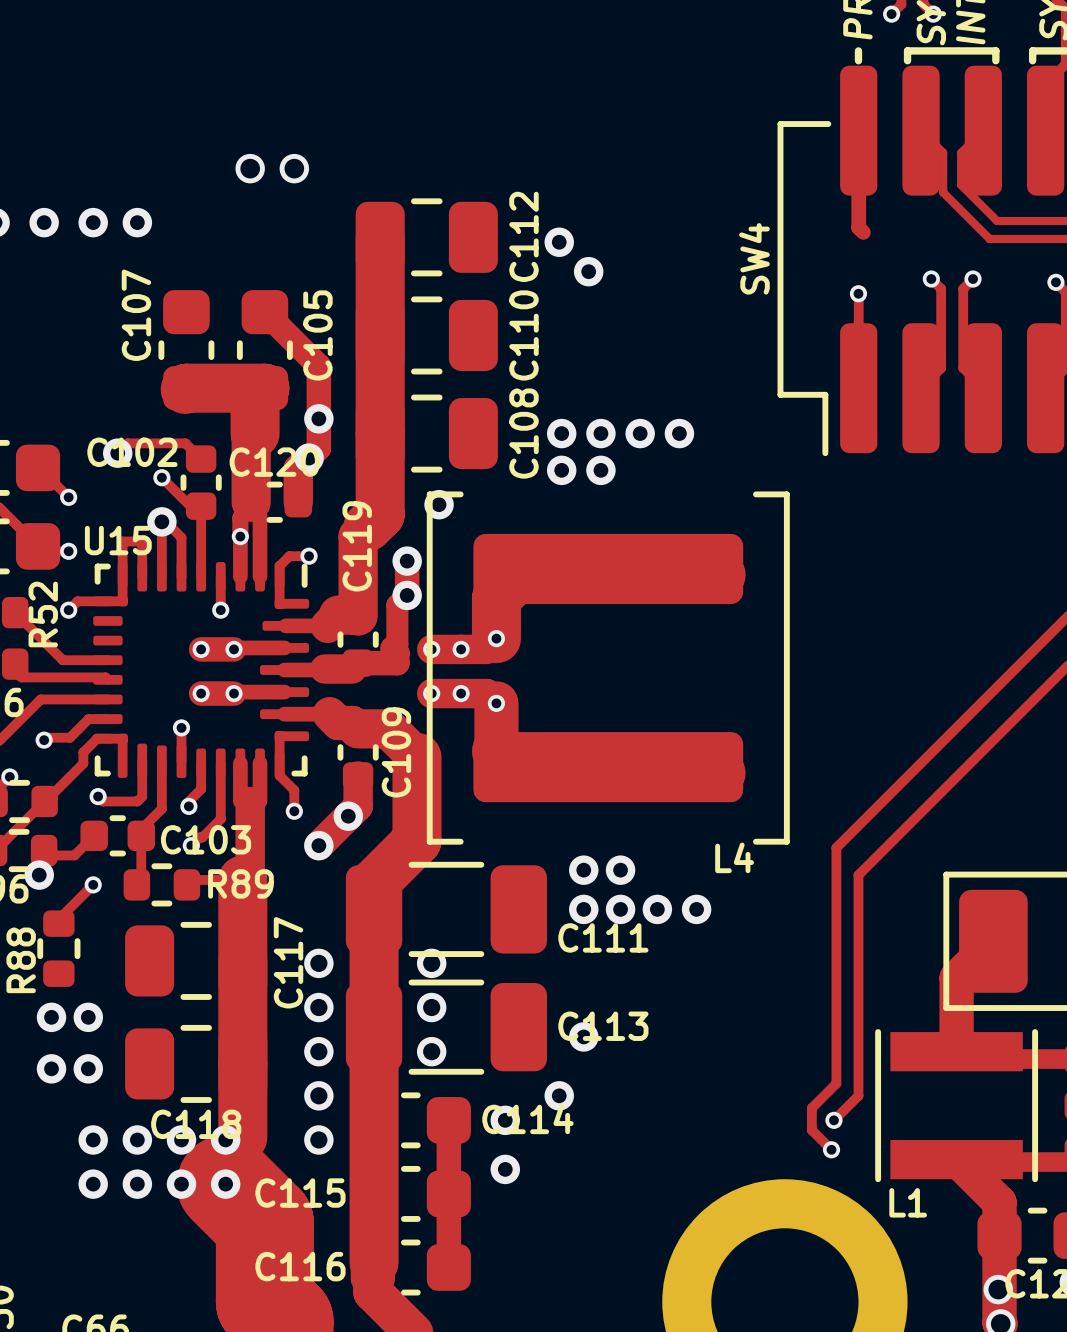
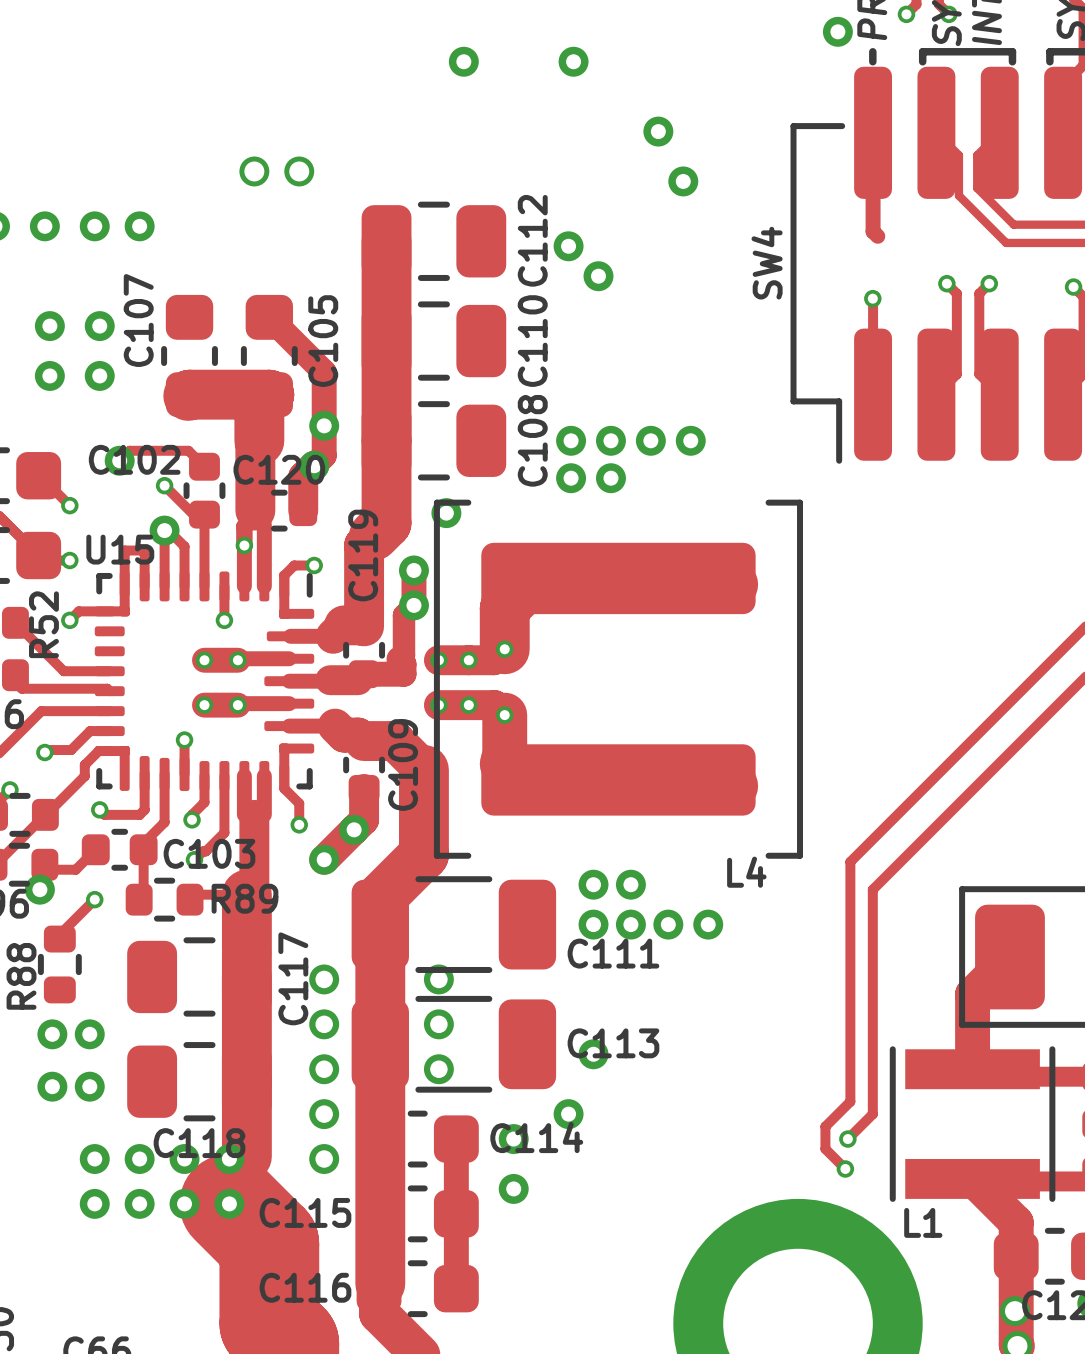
via: none -> (837, 31)
via: none -> (463, 61)
via: none -> (573, 61)
via: none -> (658, 131)
via: none -> (683, 181)
via: none -> (49, 326)
via: none -> (99, 326)
via: none -> (49, 375)
via: none -> (99, 375)

